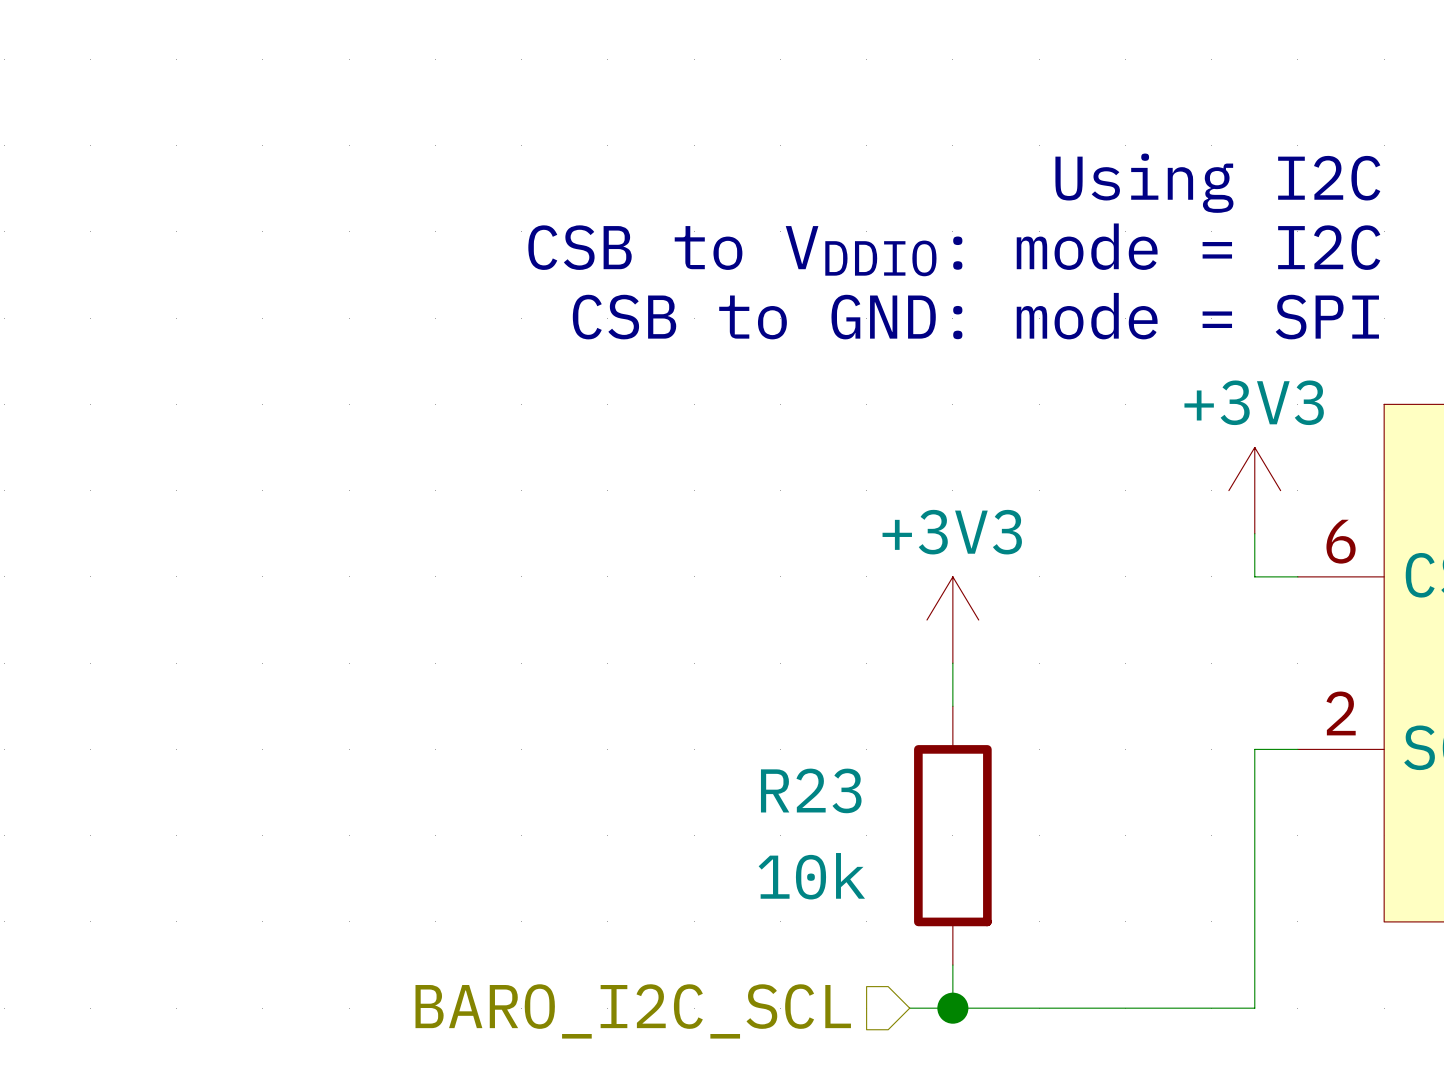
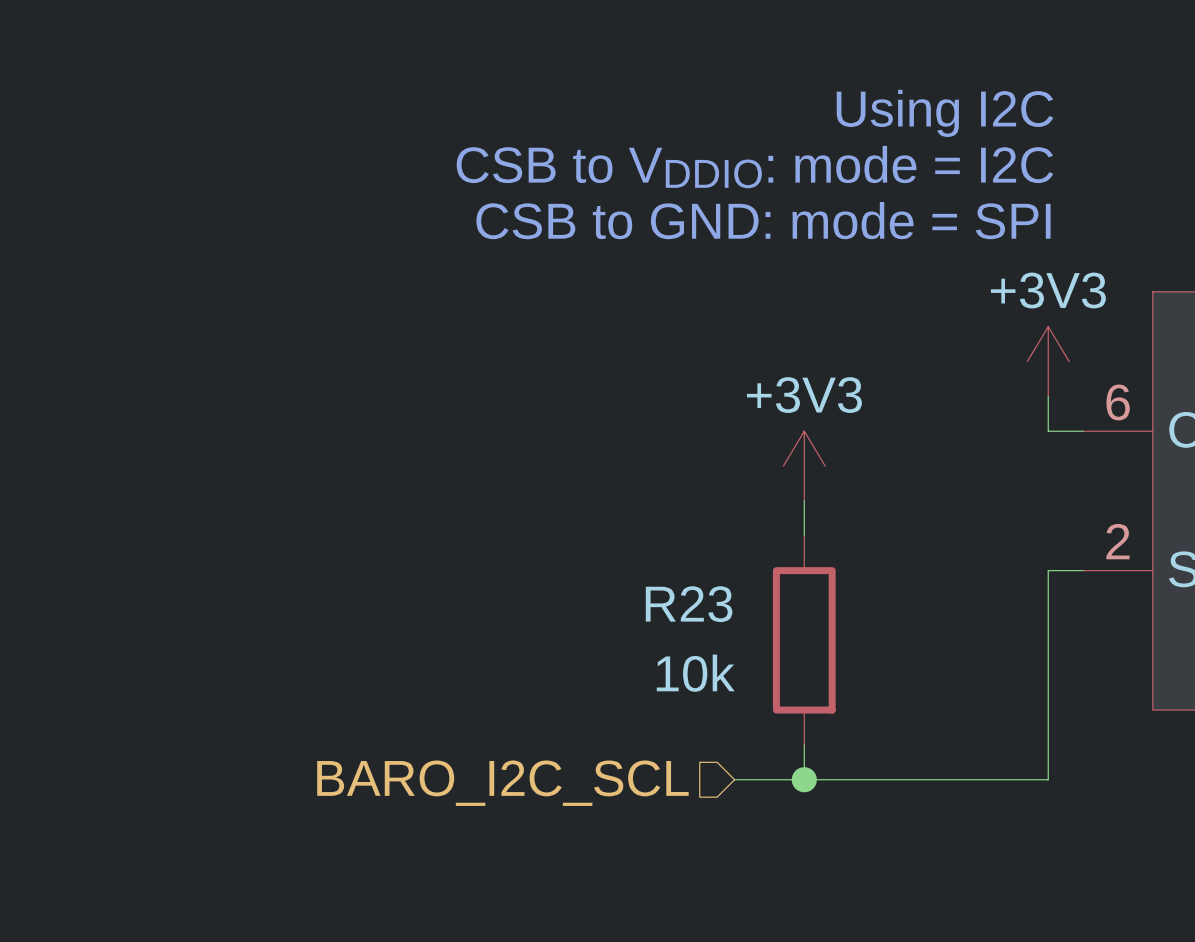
text position: Using I2C (1217, 183) -> Using I2C (945, 113)
text position: CSB to VDDIO: mode = I2C (954, 249) -> CSB to VDDIO: mode = I2C (755, 167)
text position: CSB to GND: mode = SPI (975, 316) -> CSB to GND: mode = SPI (763, 220)
wire: none -> (734, 779) (769, 779)
hierarchical label position: BARO_I2C_SCL (633, 1011) -> BARO_I2C_SCL (502, 783)

